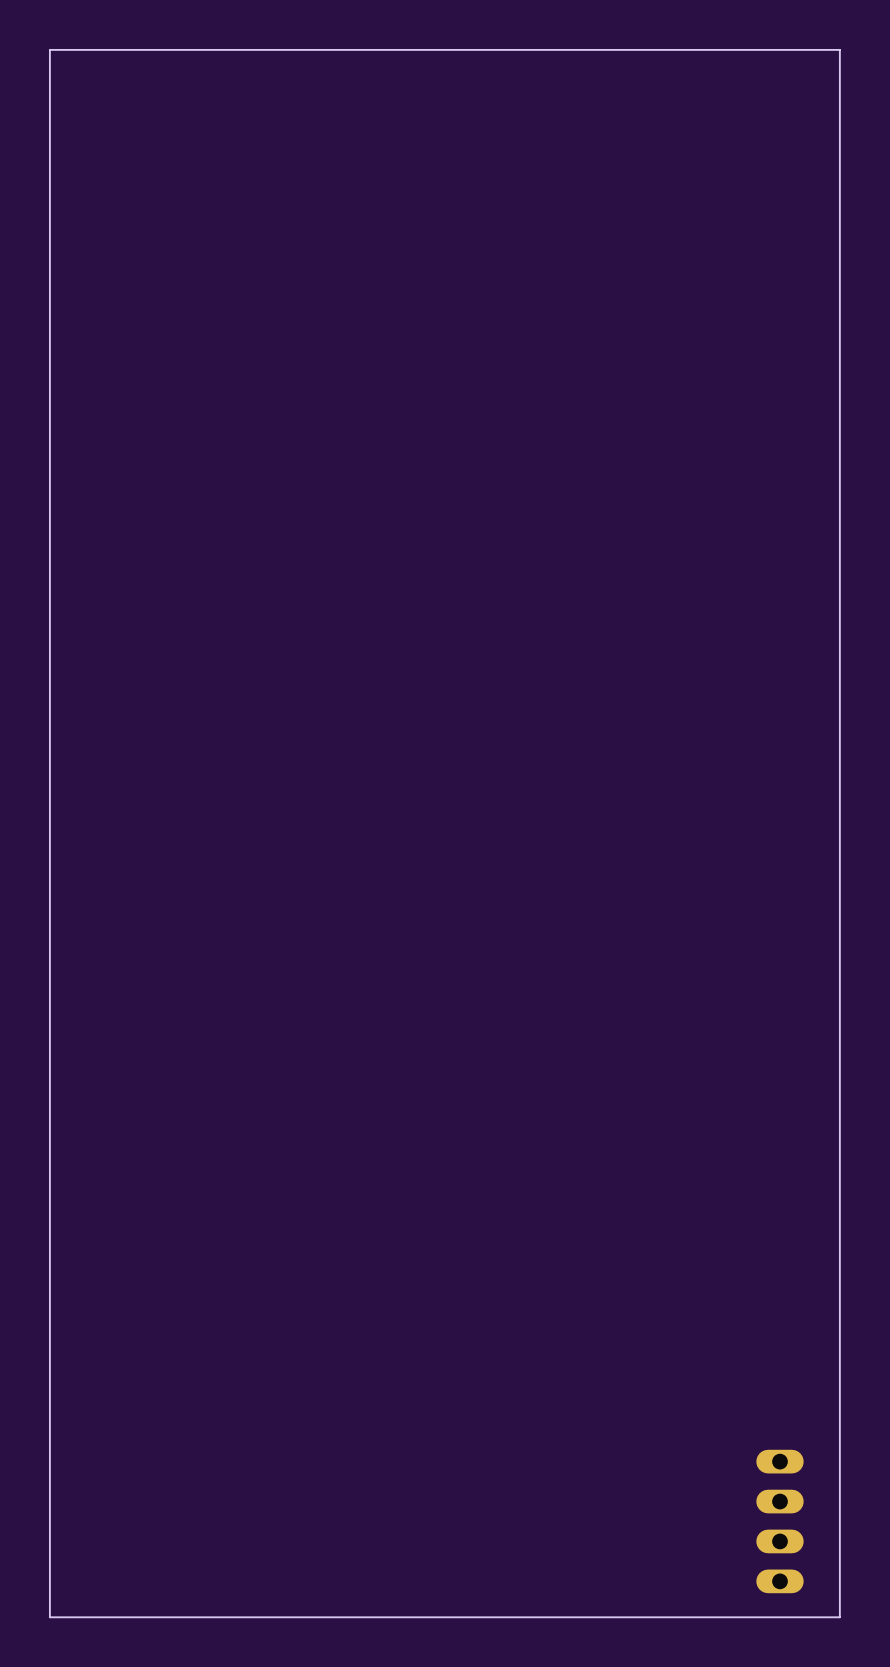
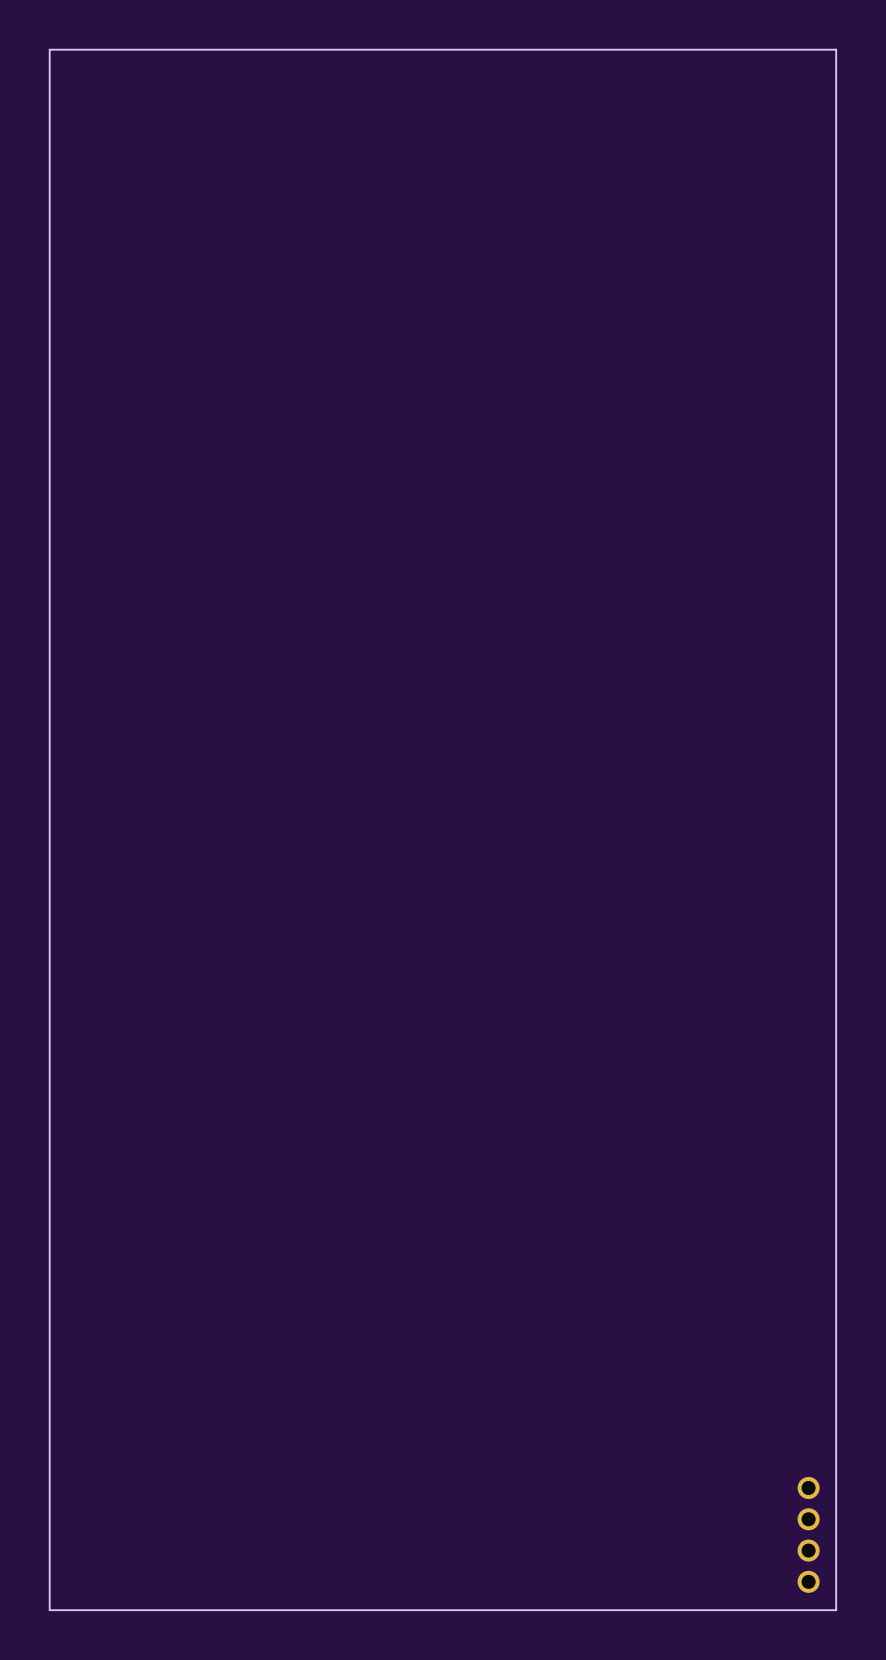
part: (780, 1521) -> none
part: none -> (808, 1534)

